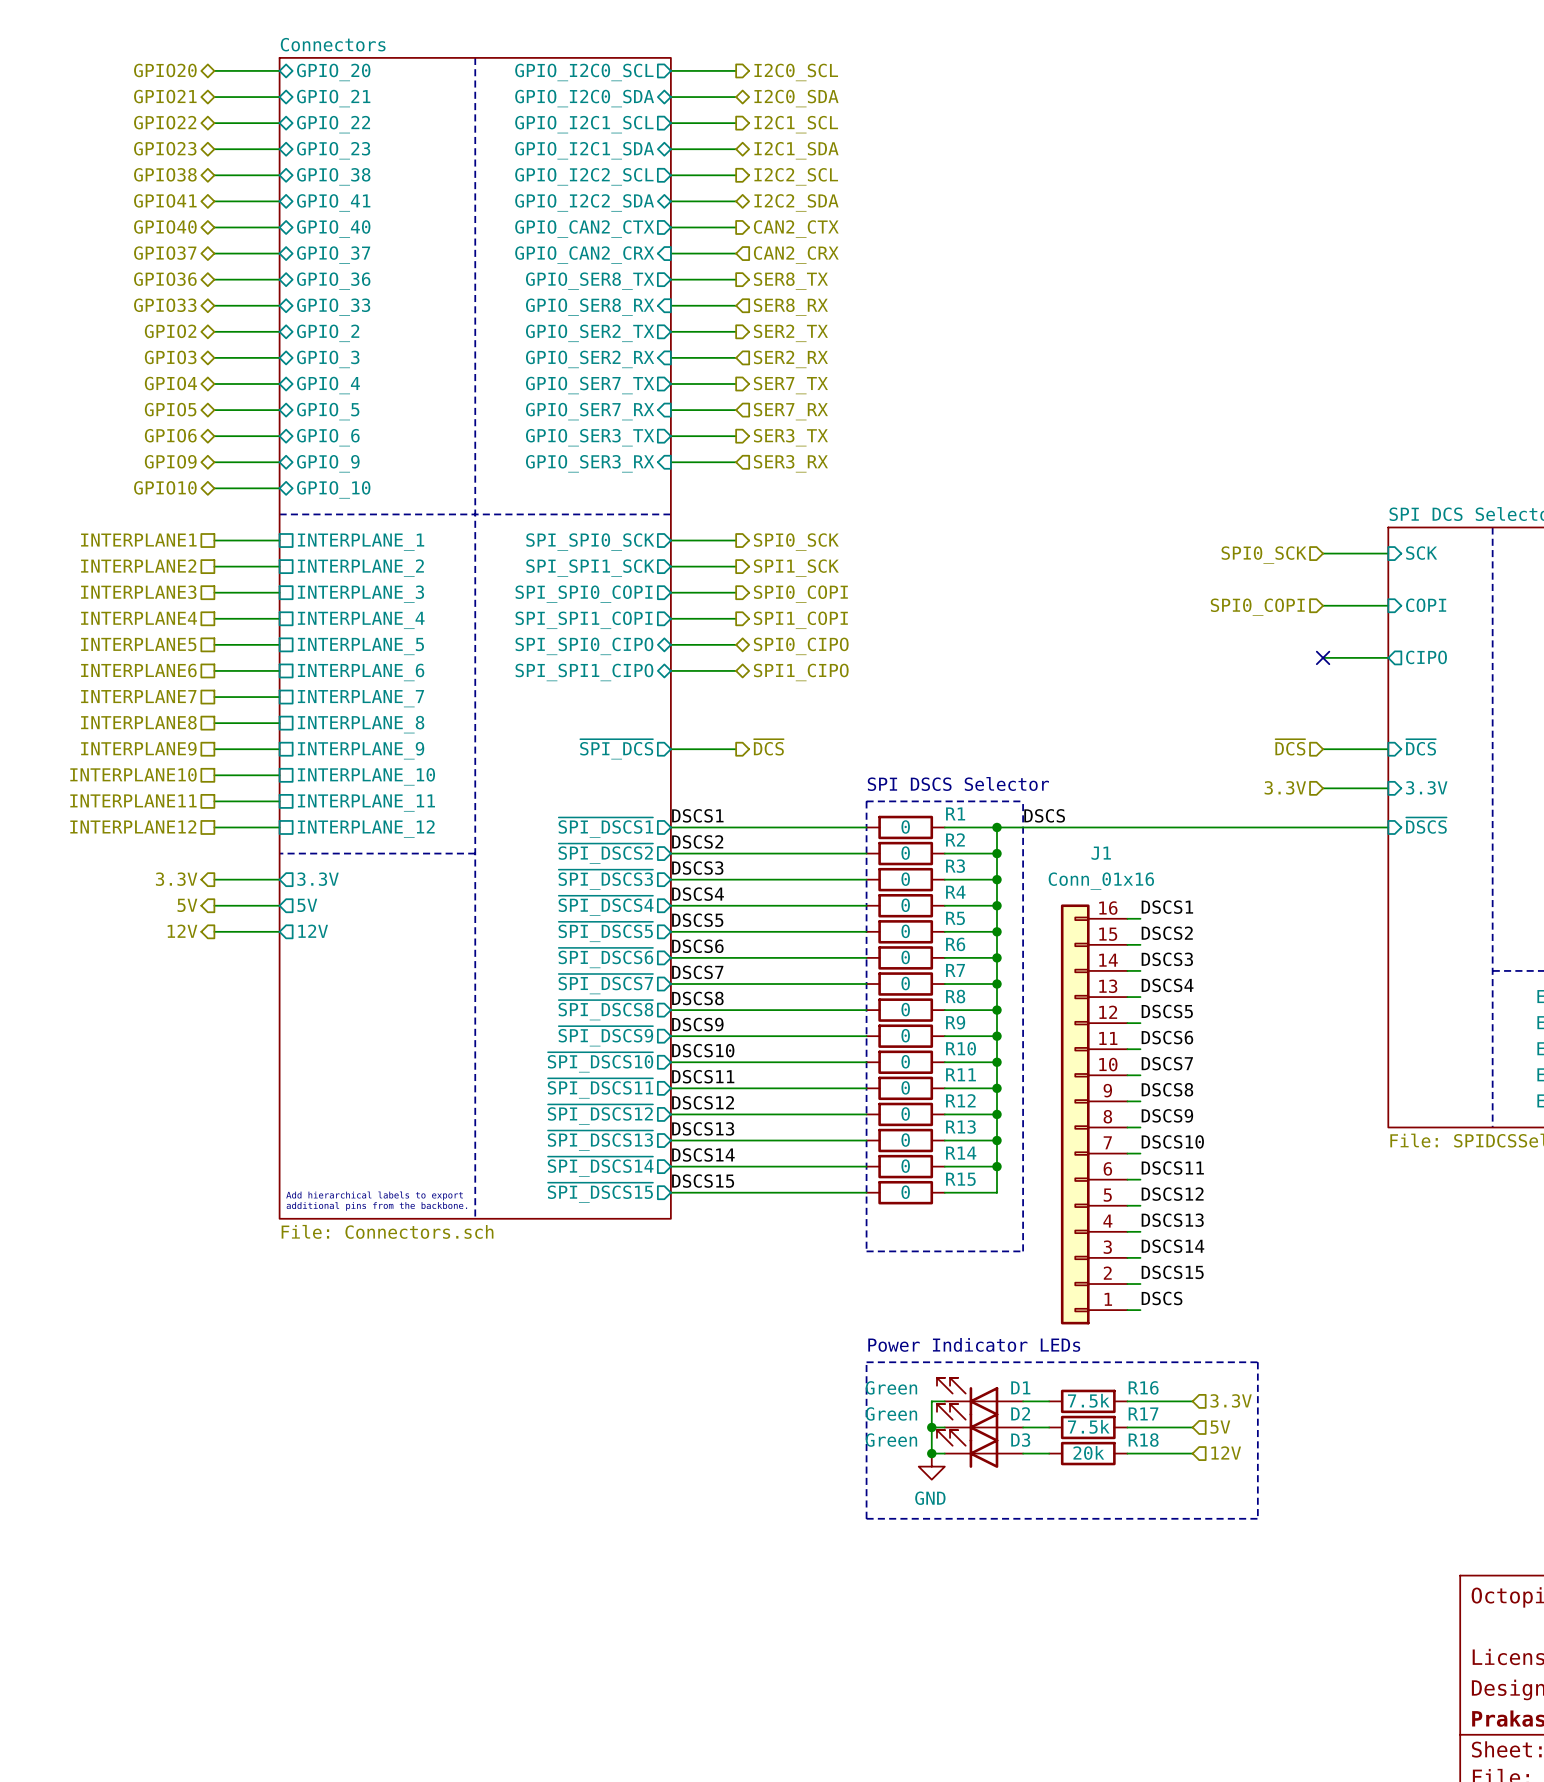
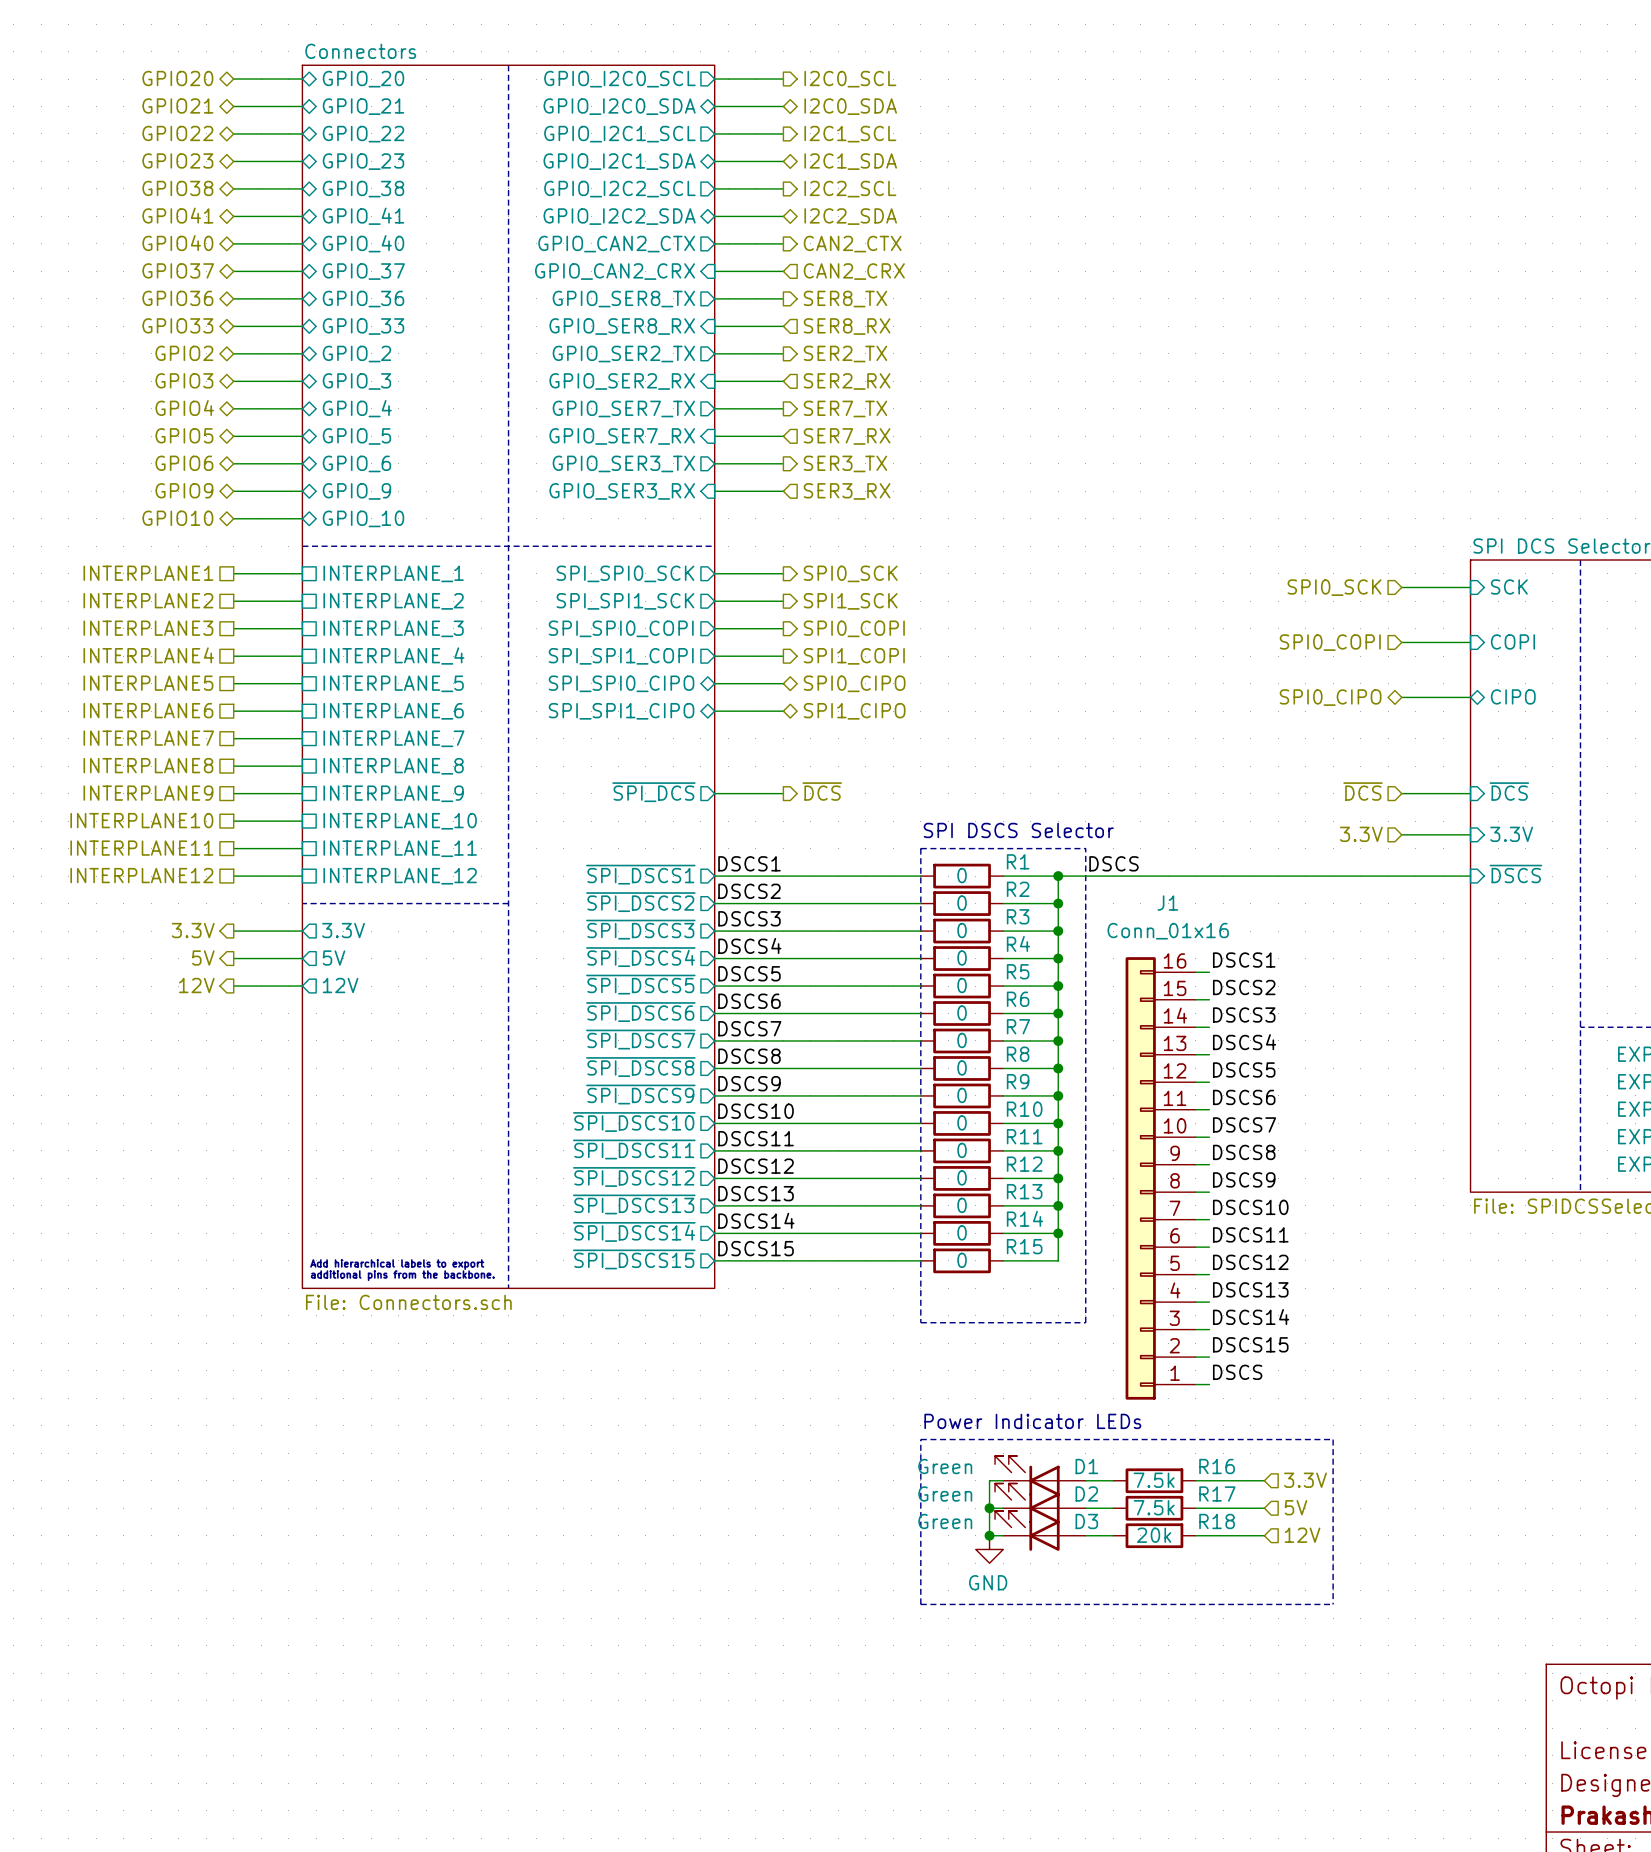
no-connect mark: (1323, 657) -> none
sheet pin shape: output (1426, 657) -> bidirectional (1513, 696)
hierarchical label: none -> SPI0_CIPO (1330, 697)

